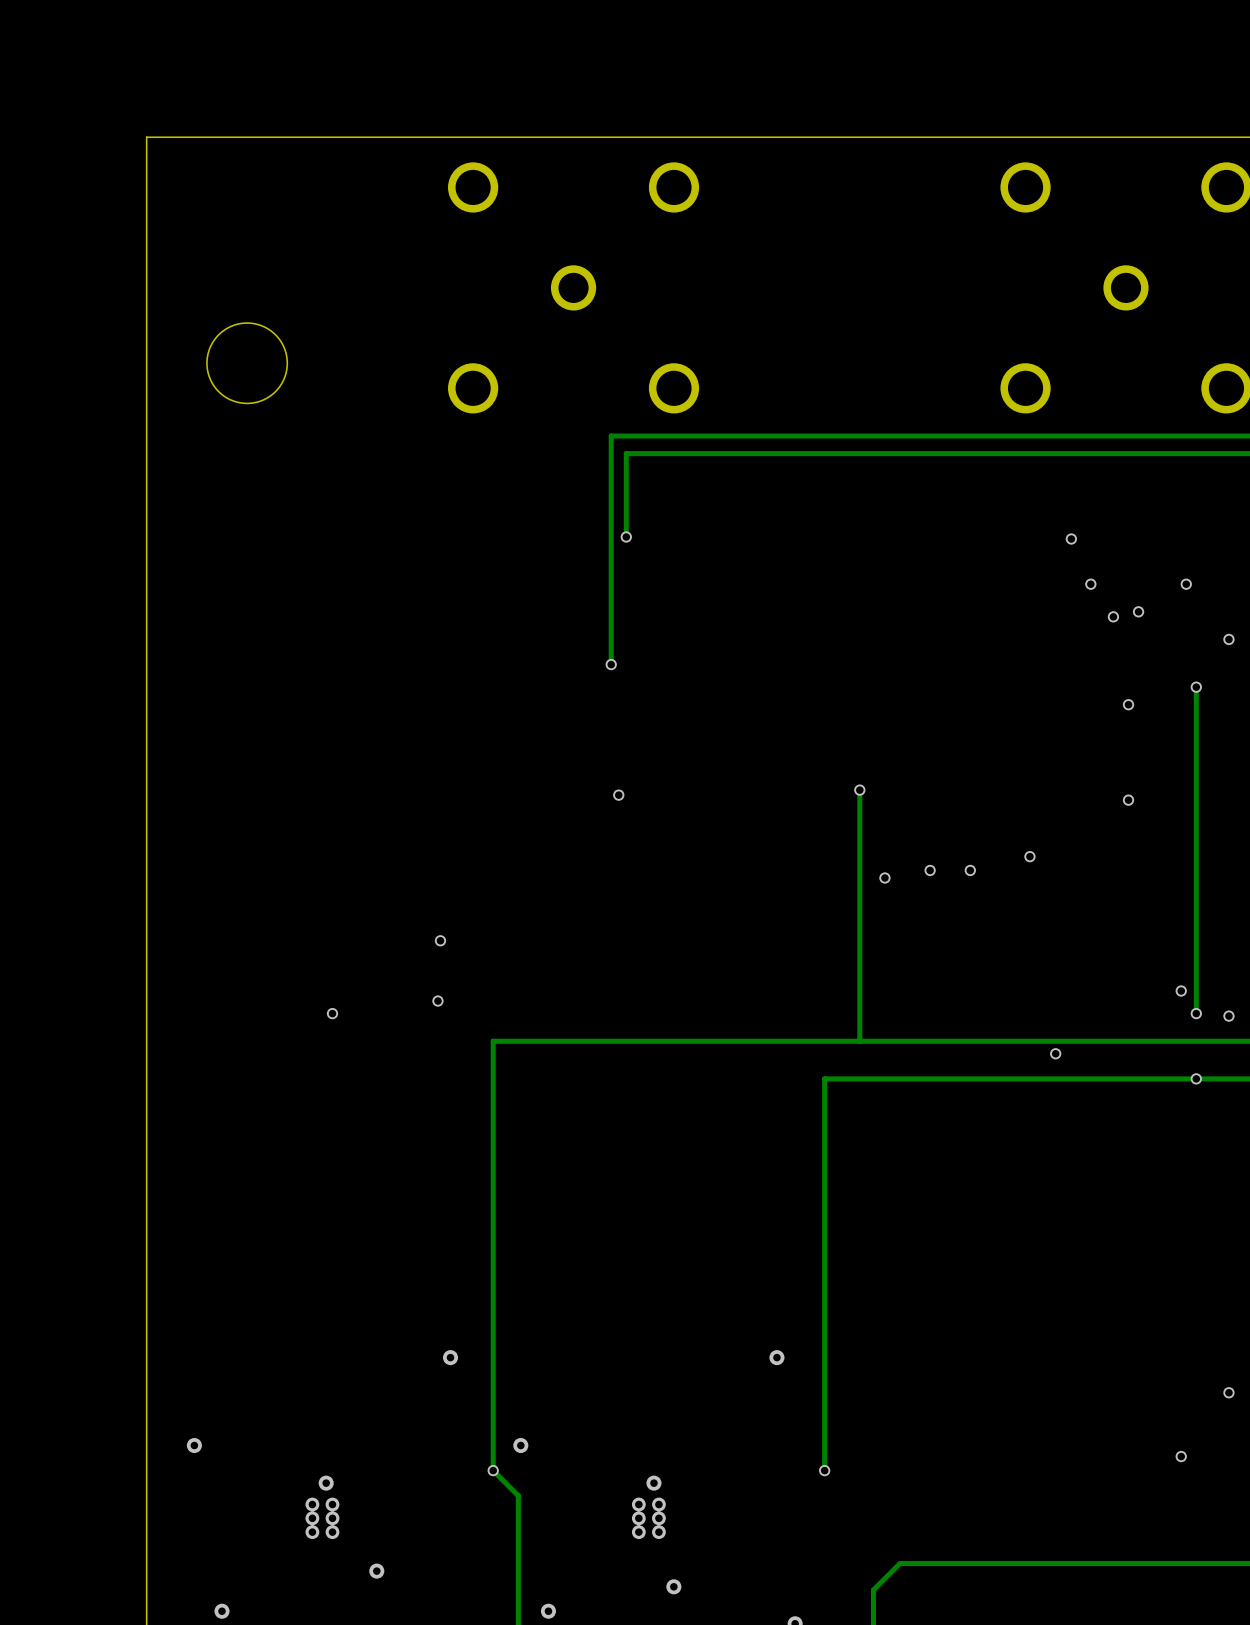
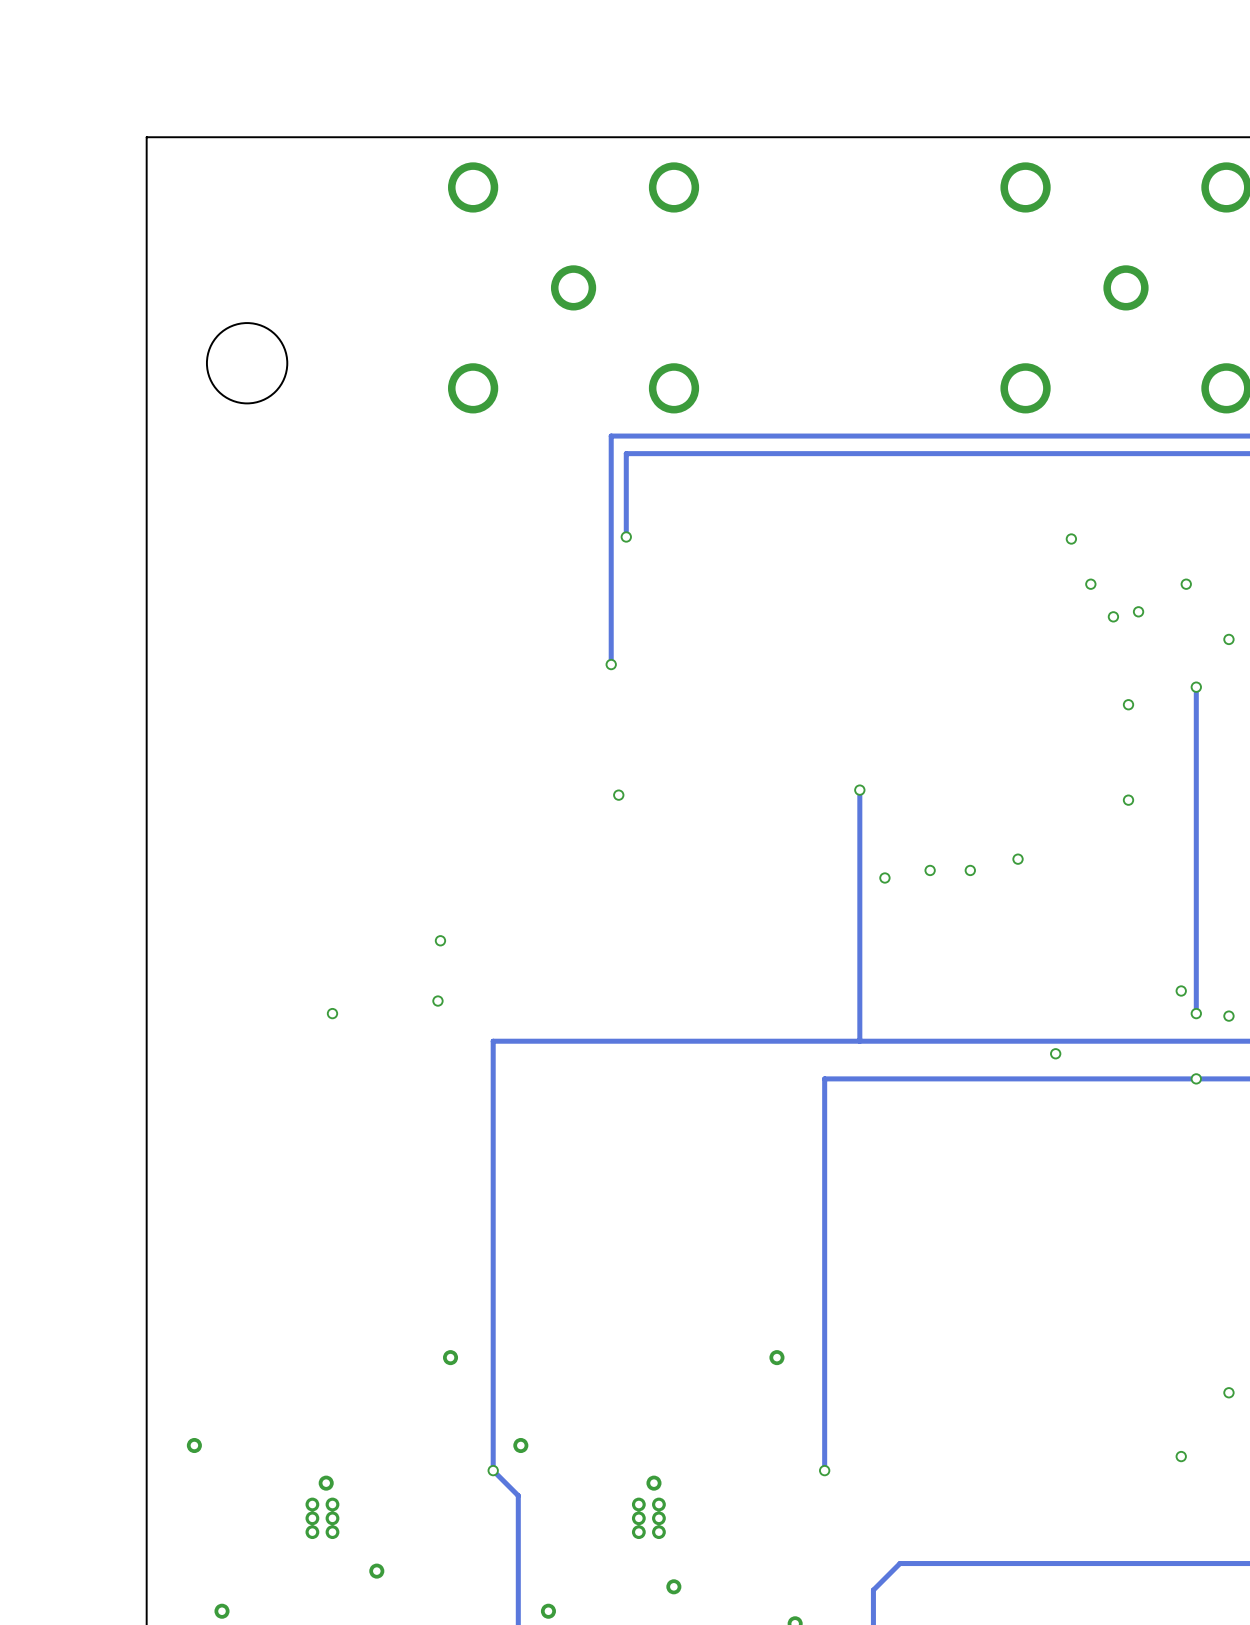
via position: (1029, 856) -> (1018, 859)

